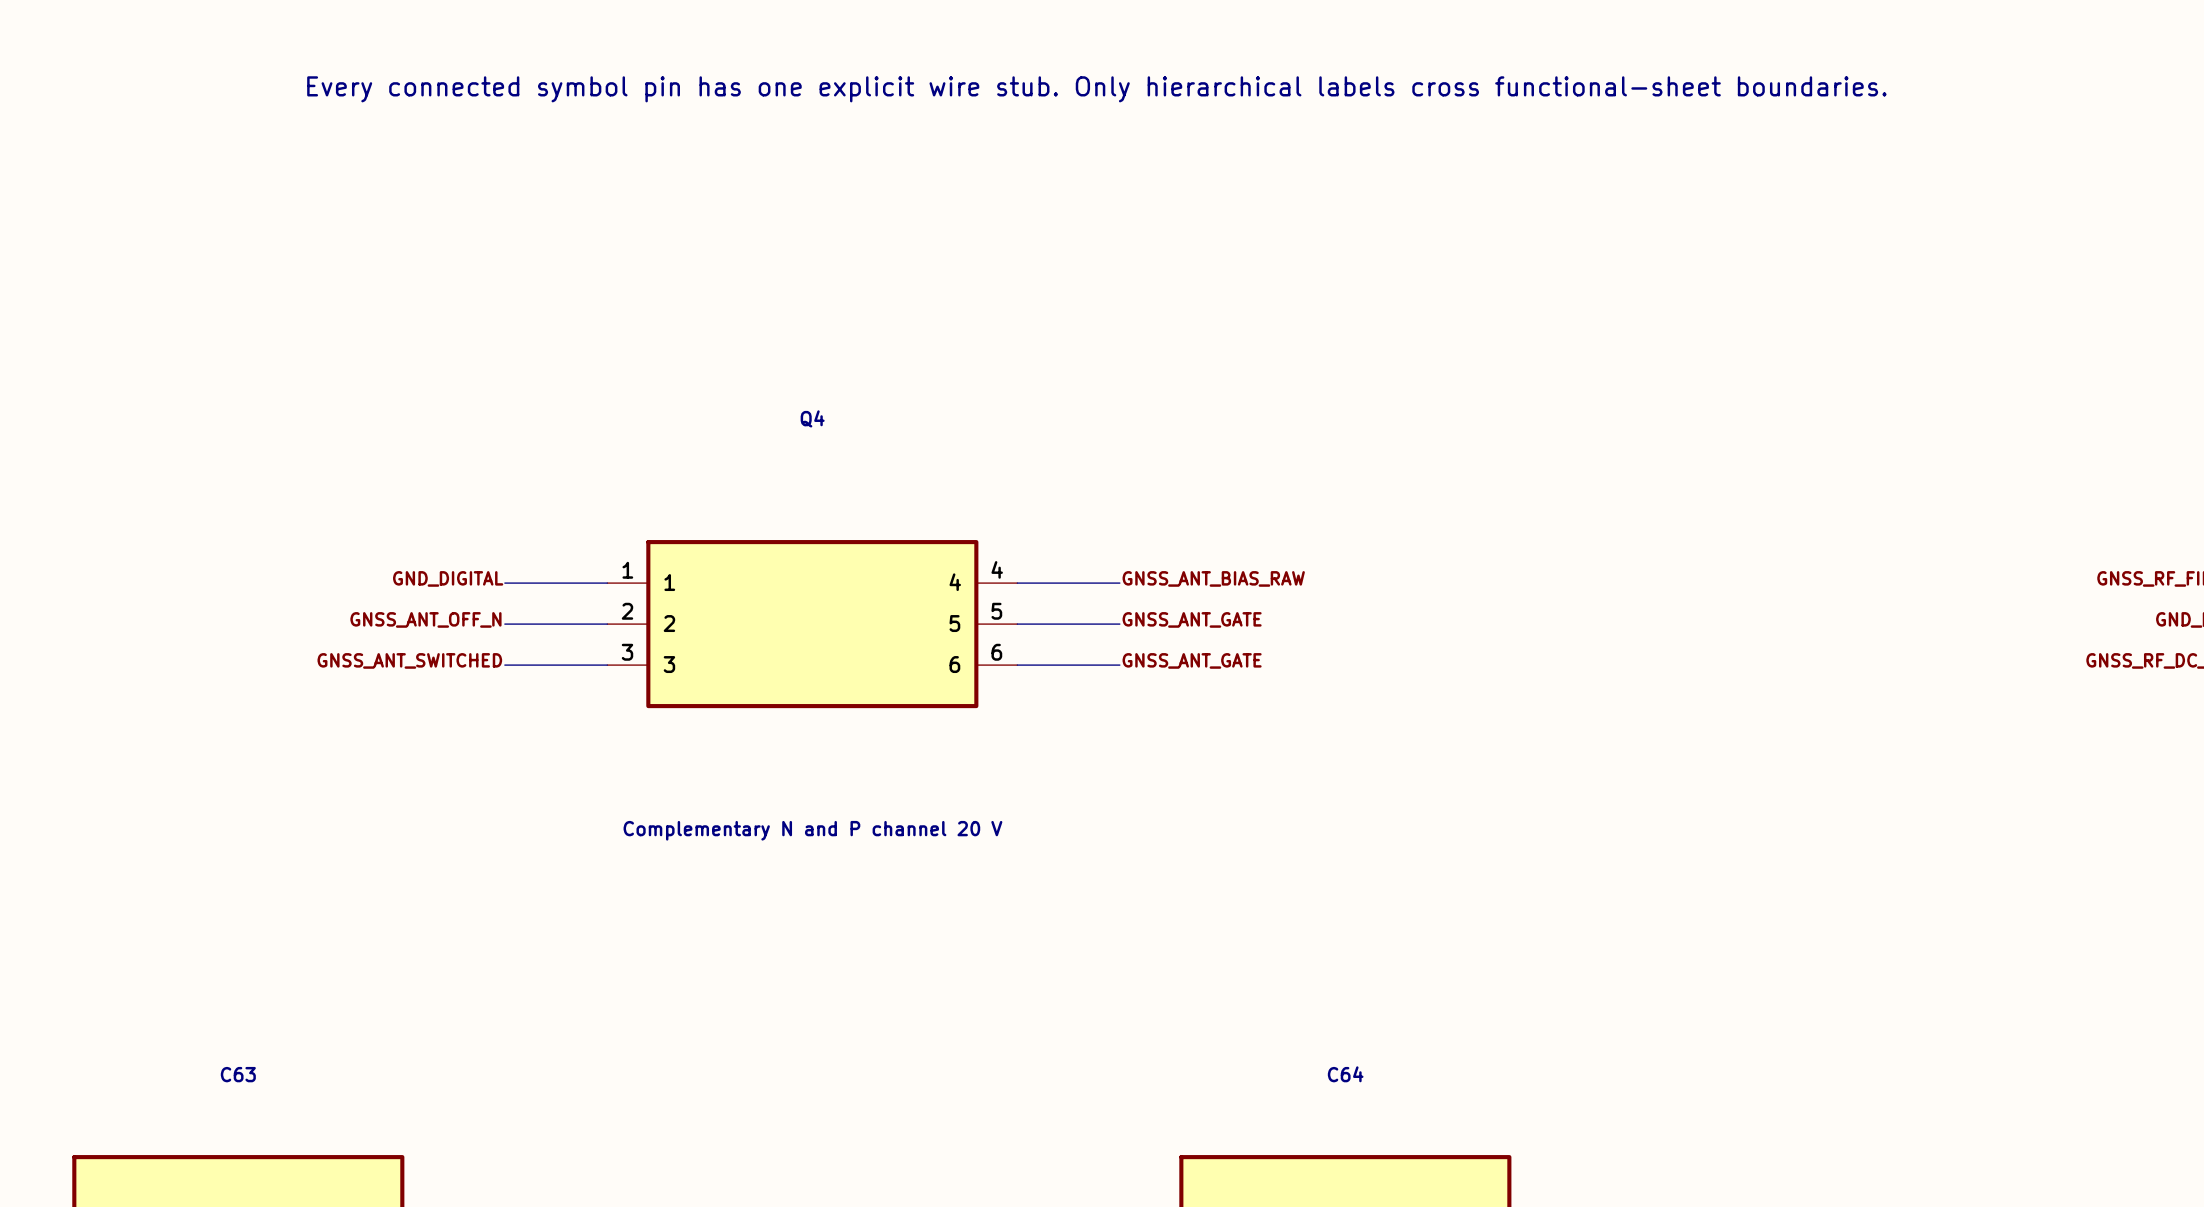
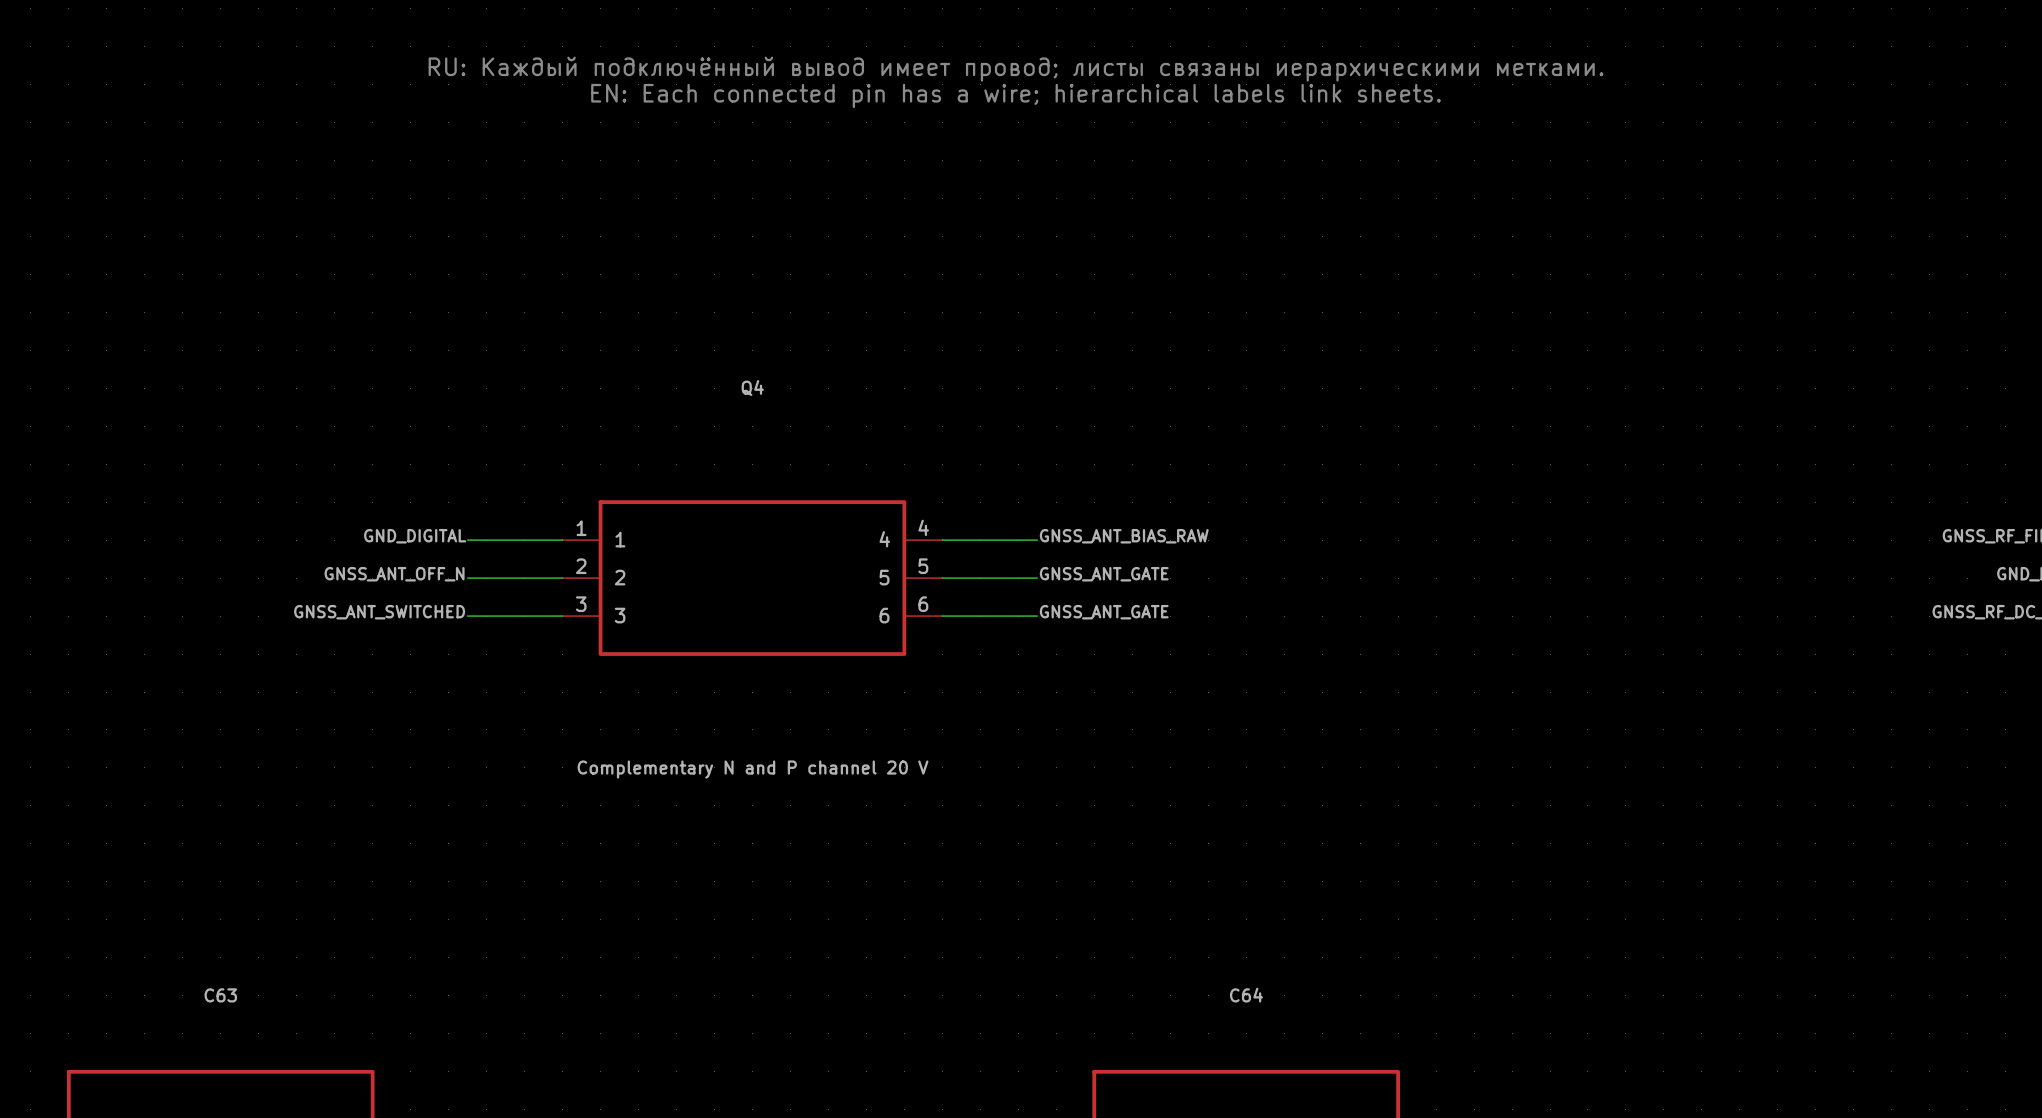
text: none -> RU: Каждый подключённый вывод имеет провод; листы связаны иерархическими метками. (1016, 69)
text: Every connected symbol pin has one explicit wire stub. Only hierarchical labels cross functional-sheet boundaries. (1096, 89) -> none
text: none -> EN: Each connected pin has a wire; hierarchical labels link sheets. (1016, 95)

